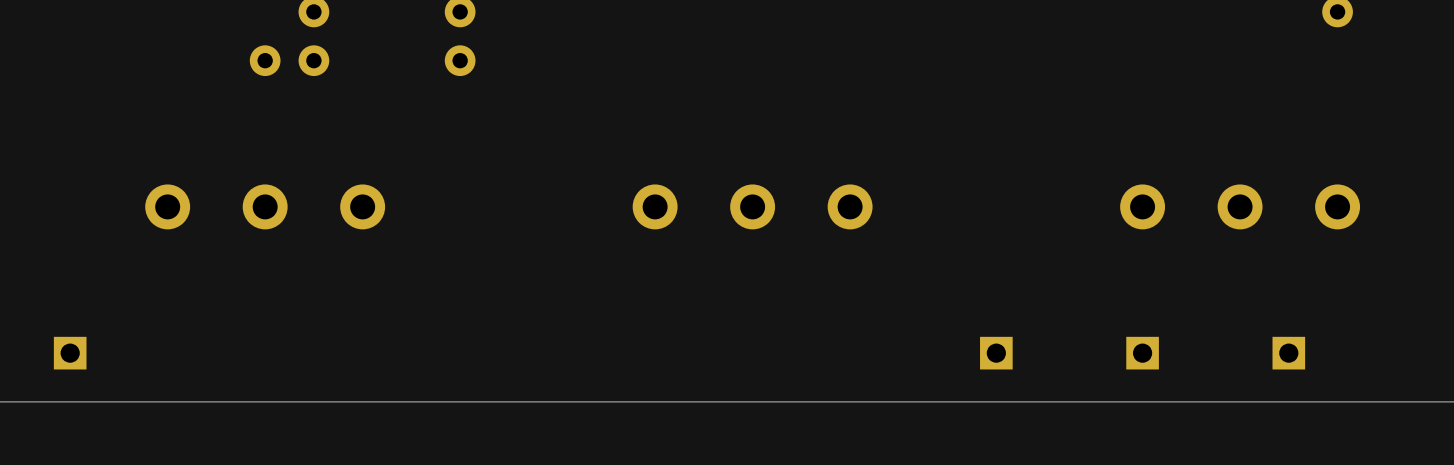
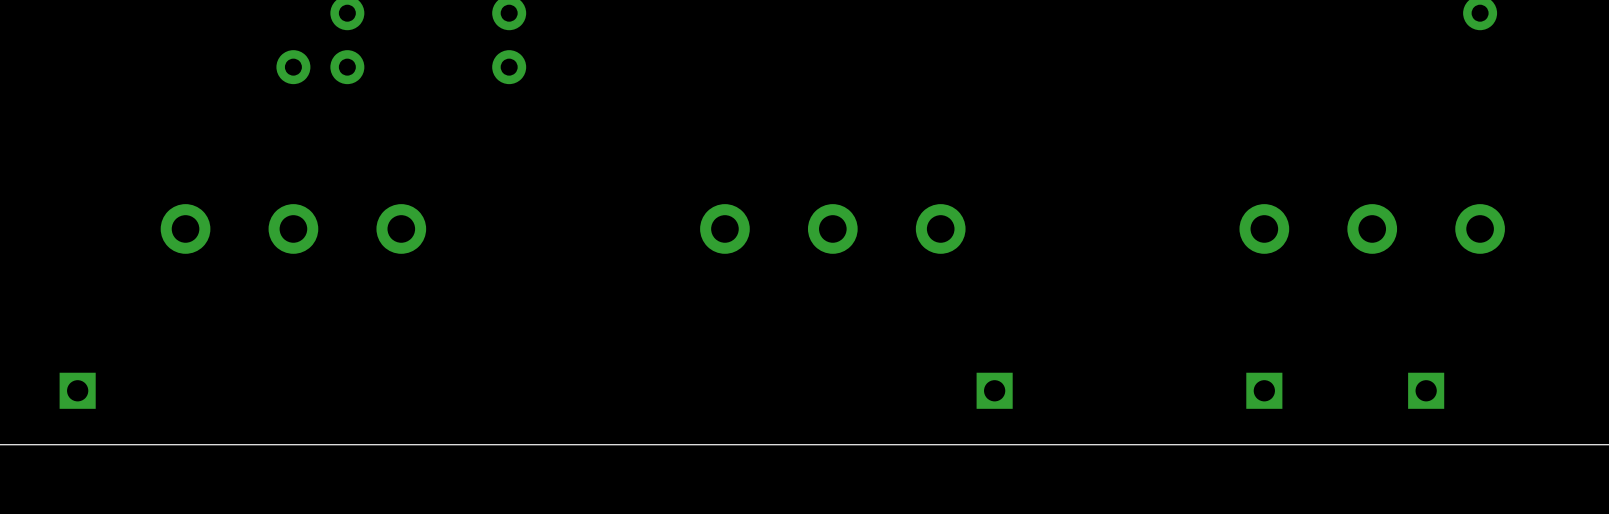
part position: (996, 353) -> (994, 390)

